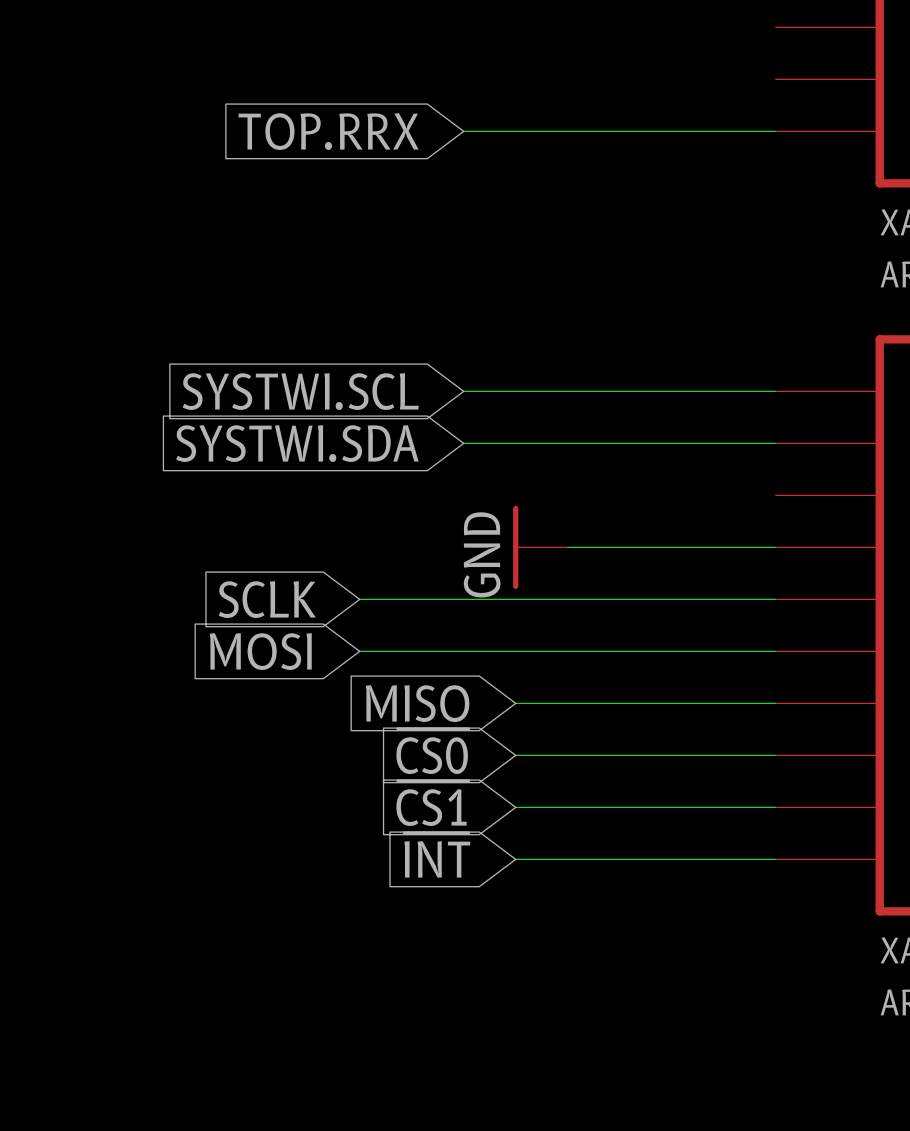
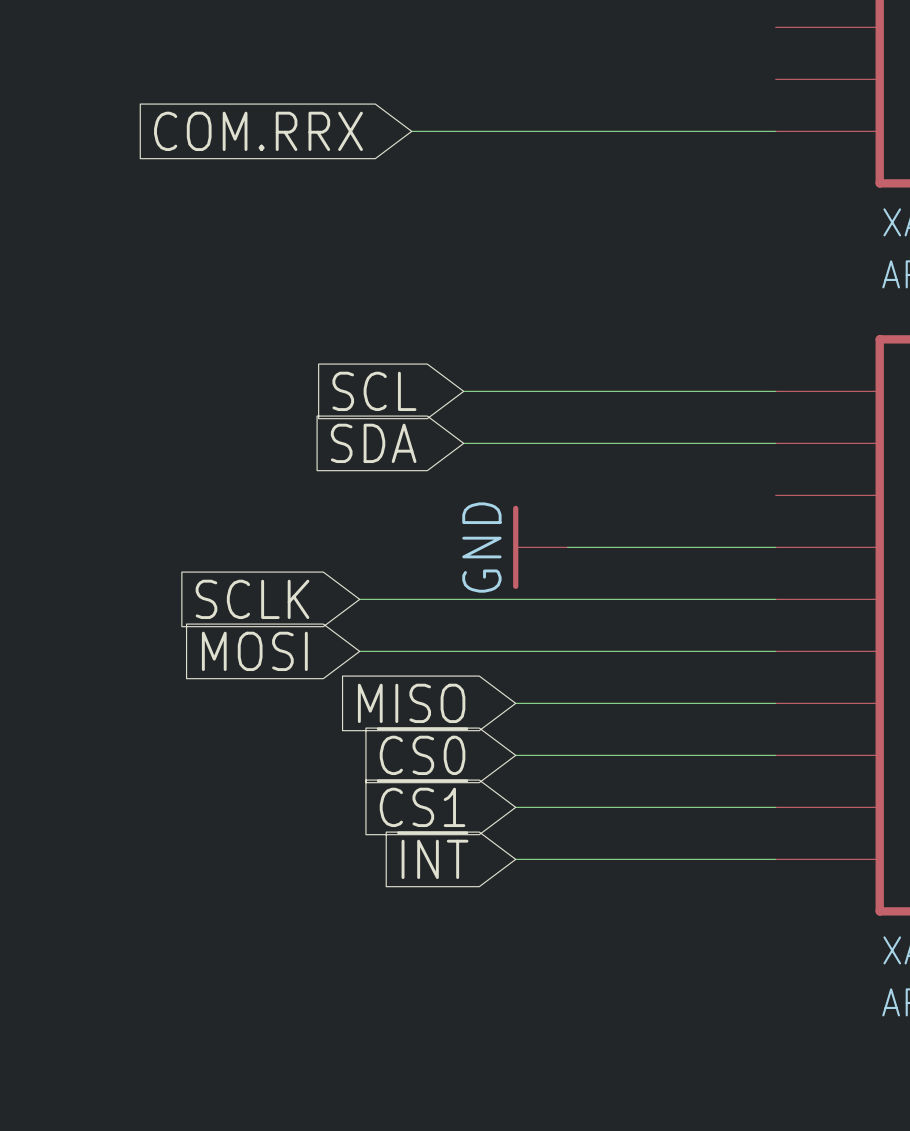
global label: TOP.RRX (328, 131) -> COM.RRX (258, 131)
wire: none -> (411, 131) (463, 131)
global label: SYSTWI.SCL (300, 391) -> SCL (374, 391)
global label: SYSTWI.SDA (297, 443) -> SDA (373, 443)

